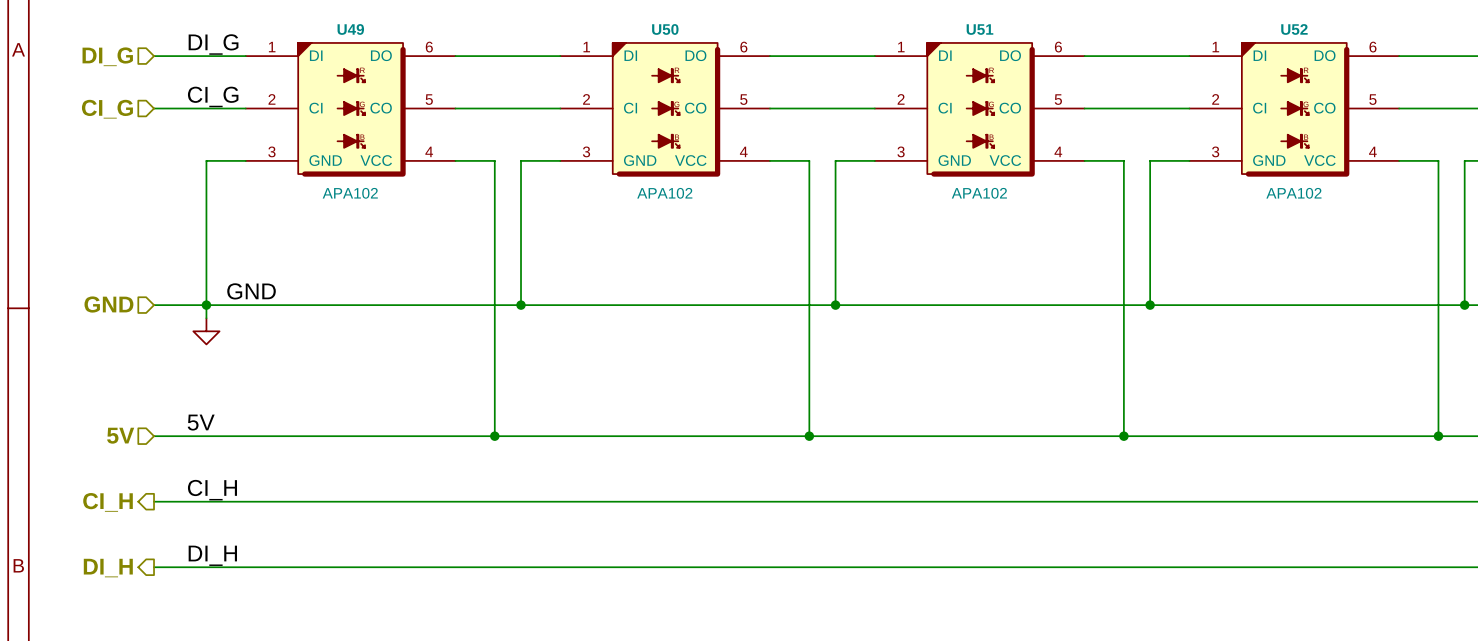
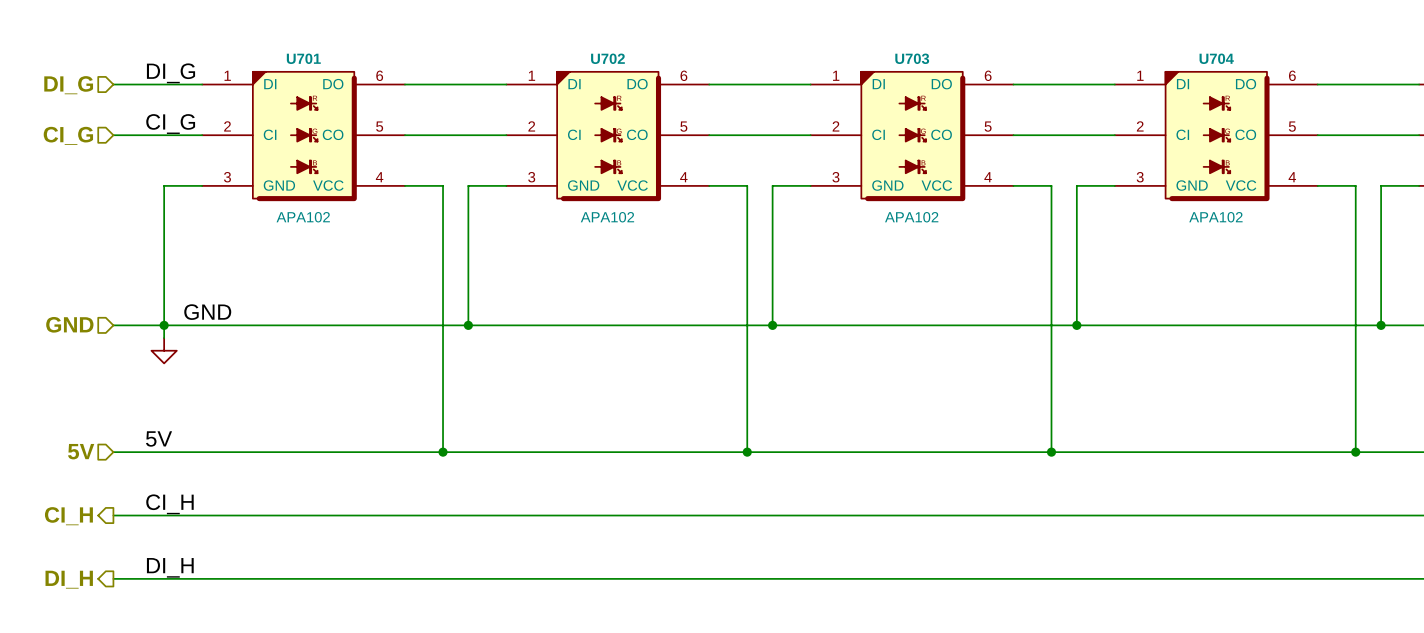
U49 name: U49 (350, 29) -> U701 (303, 58)
U50 name: U50 (665, 29) -> U702 (607, 58)
U51 name: U51 (979, 29) -> U703 (912, 58)
U52 name: U52 (1294, 29) -> U704 (1216, 58)

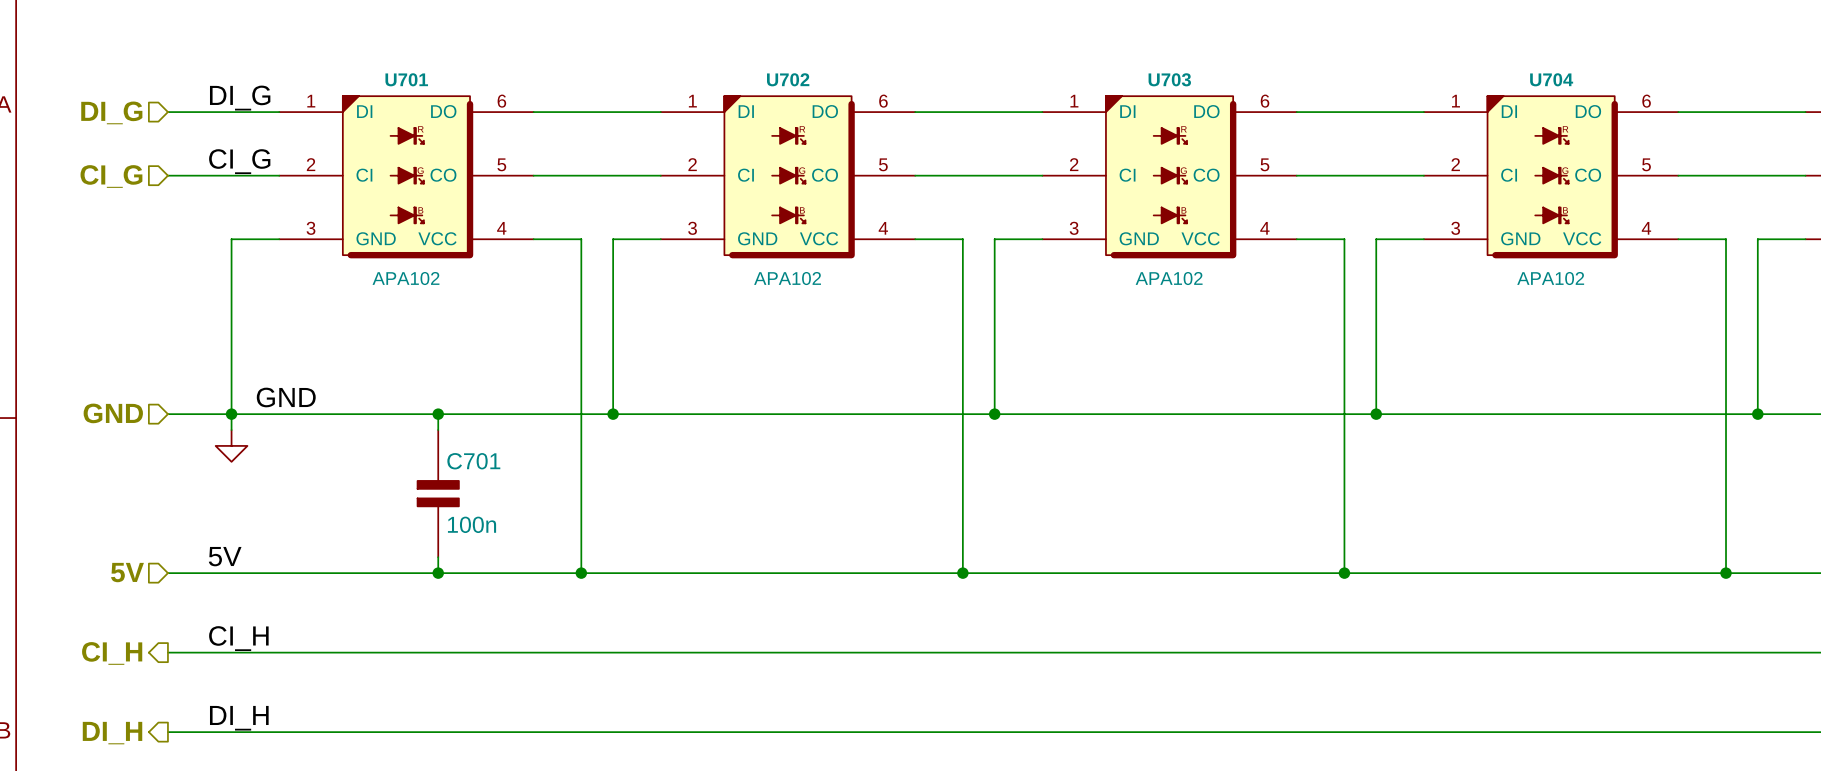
wire: none -> (438, 414) (438, 430)
junction: none -> (438, 414)
C701: none -> 100n (438, 493)
wire: none -> (438, 557) (438, 573)
junction: none -> (438, 573)

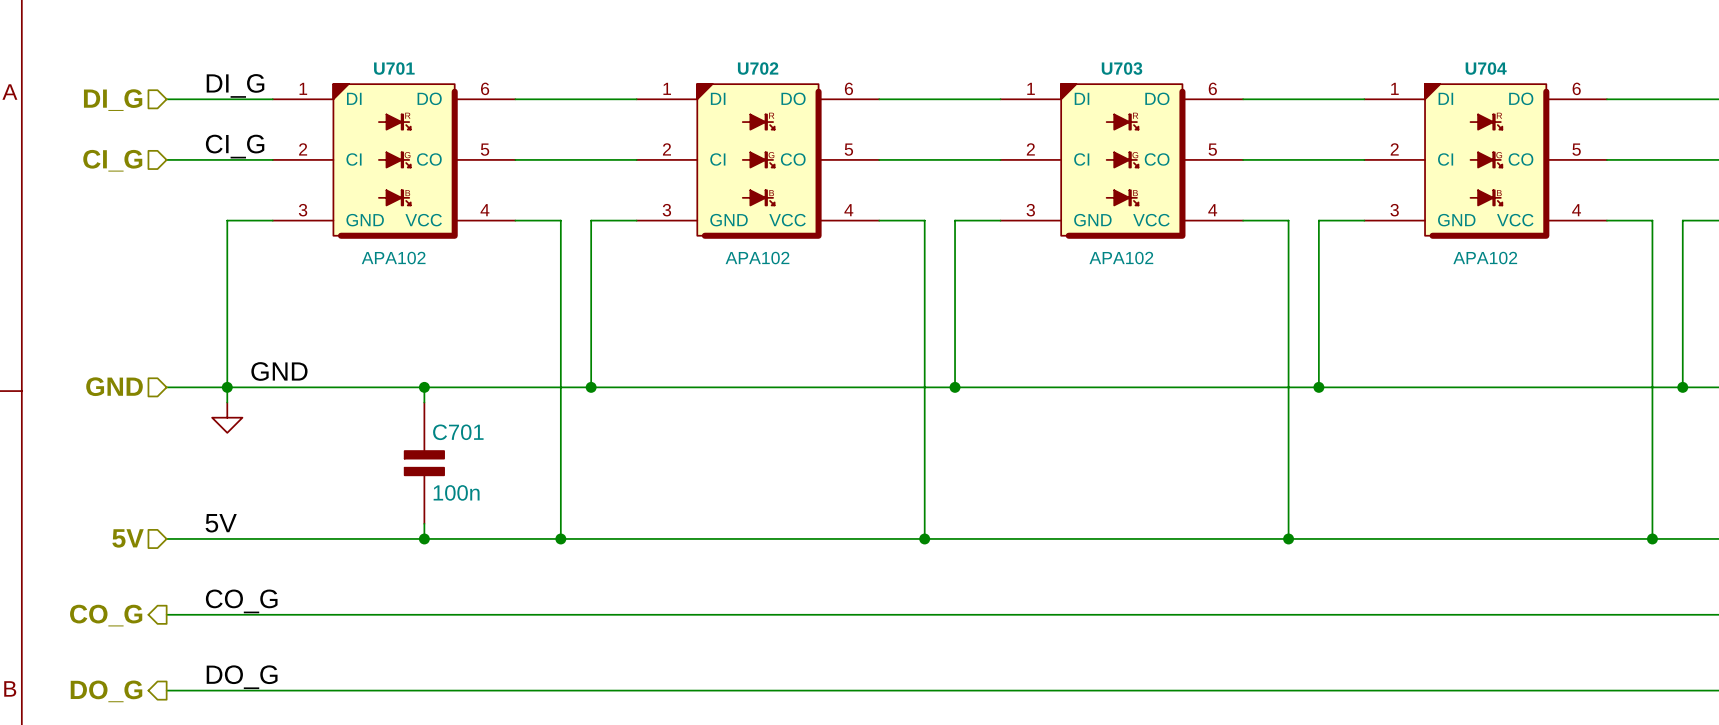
label: CI_H (238, 638) -> CO_G (241, 601)
hierarchical label: CI_H (112, 653) -> CO_G (106, 615)
label: DI_H (239, 718) -> DO_G (242, 677)
hierarchical label: DI_H (112, 733) -> DO_G (106, 691)

